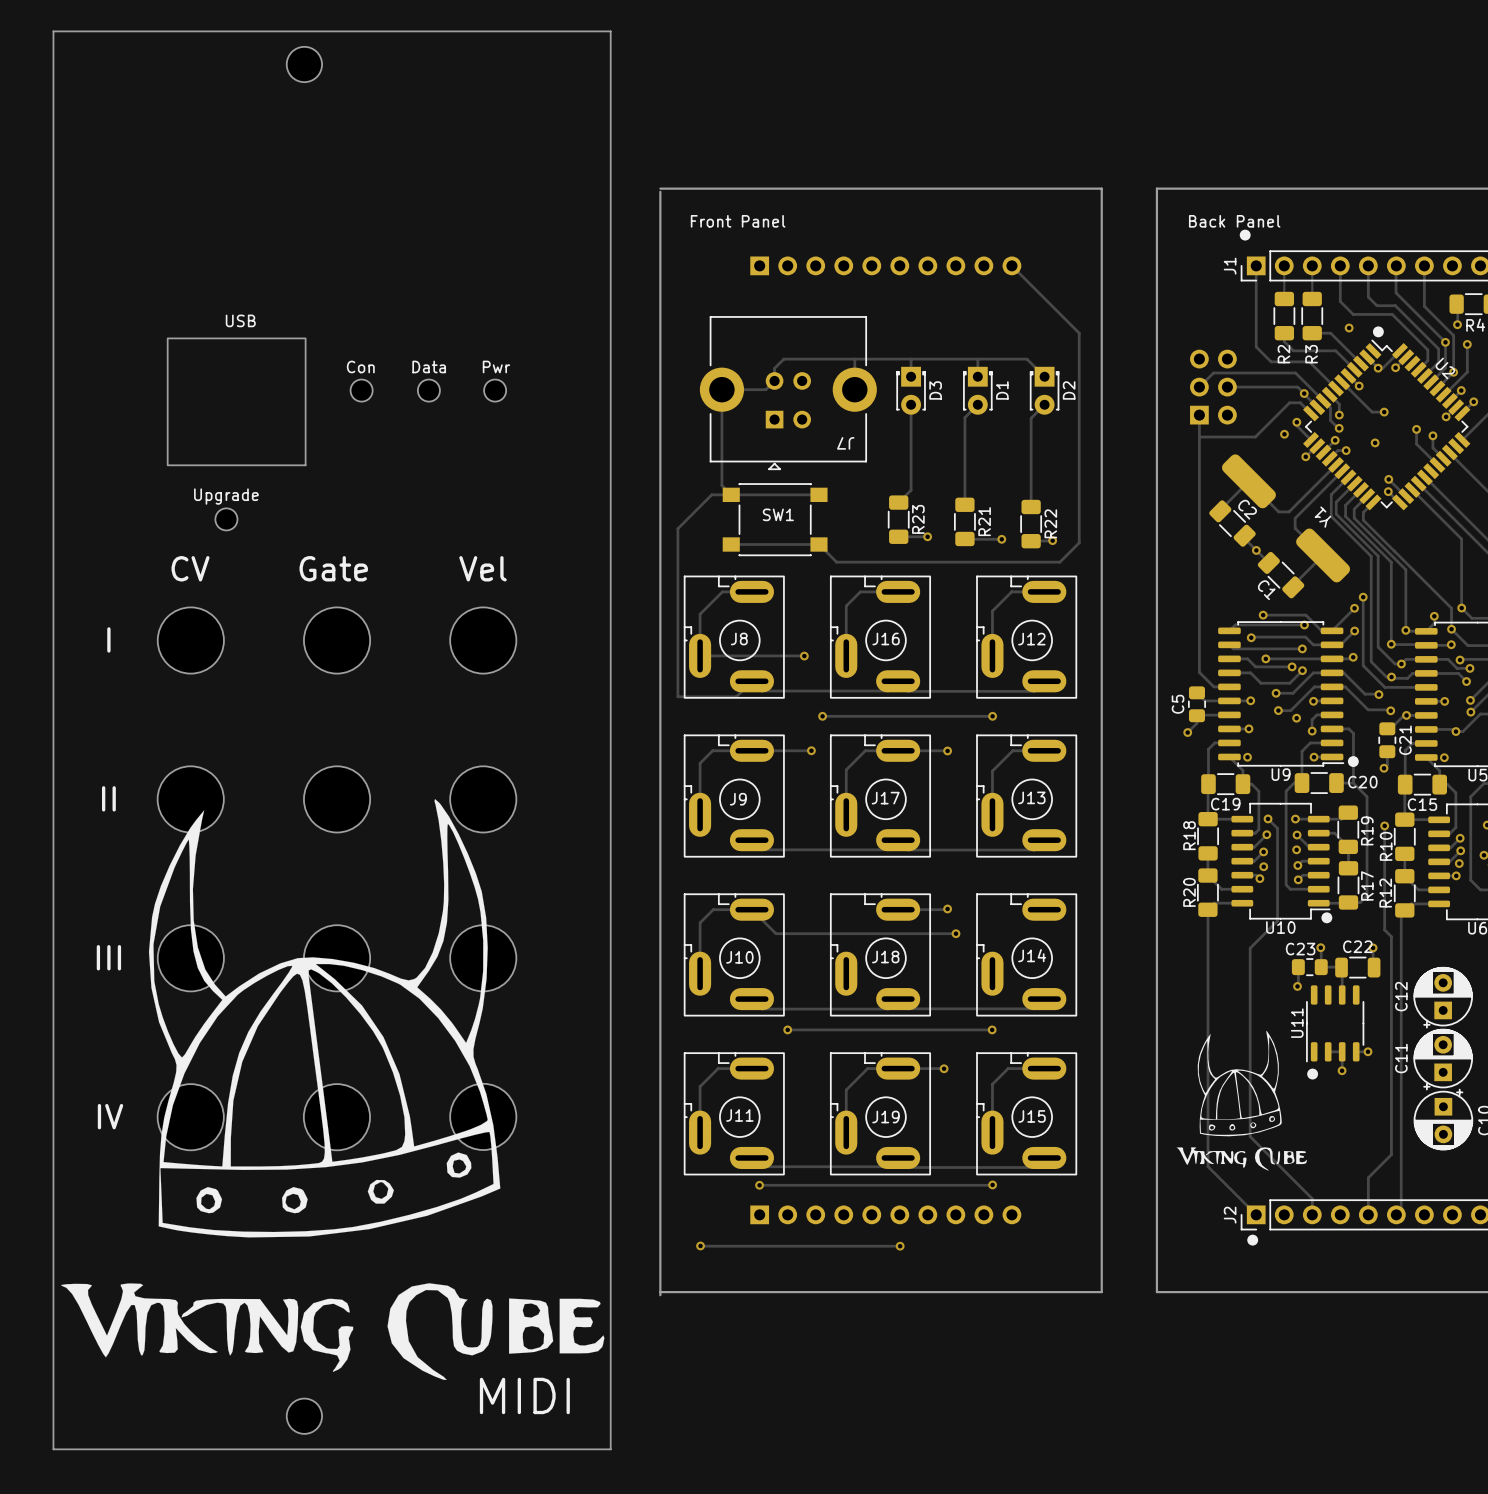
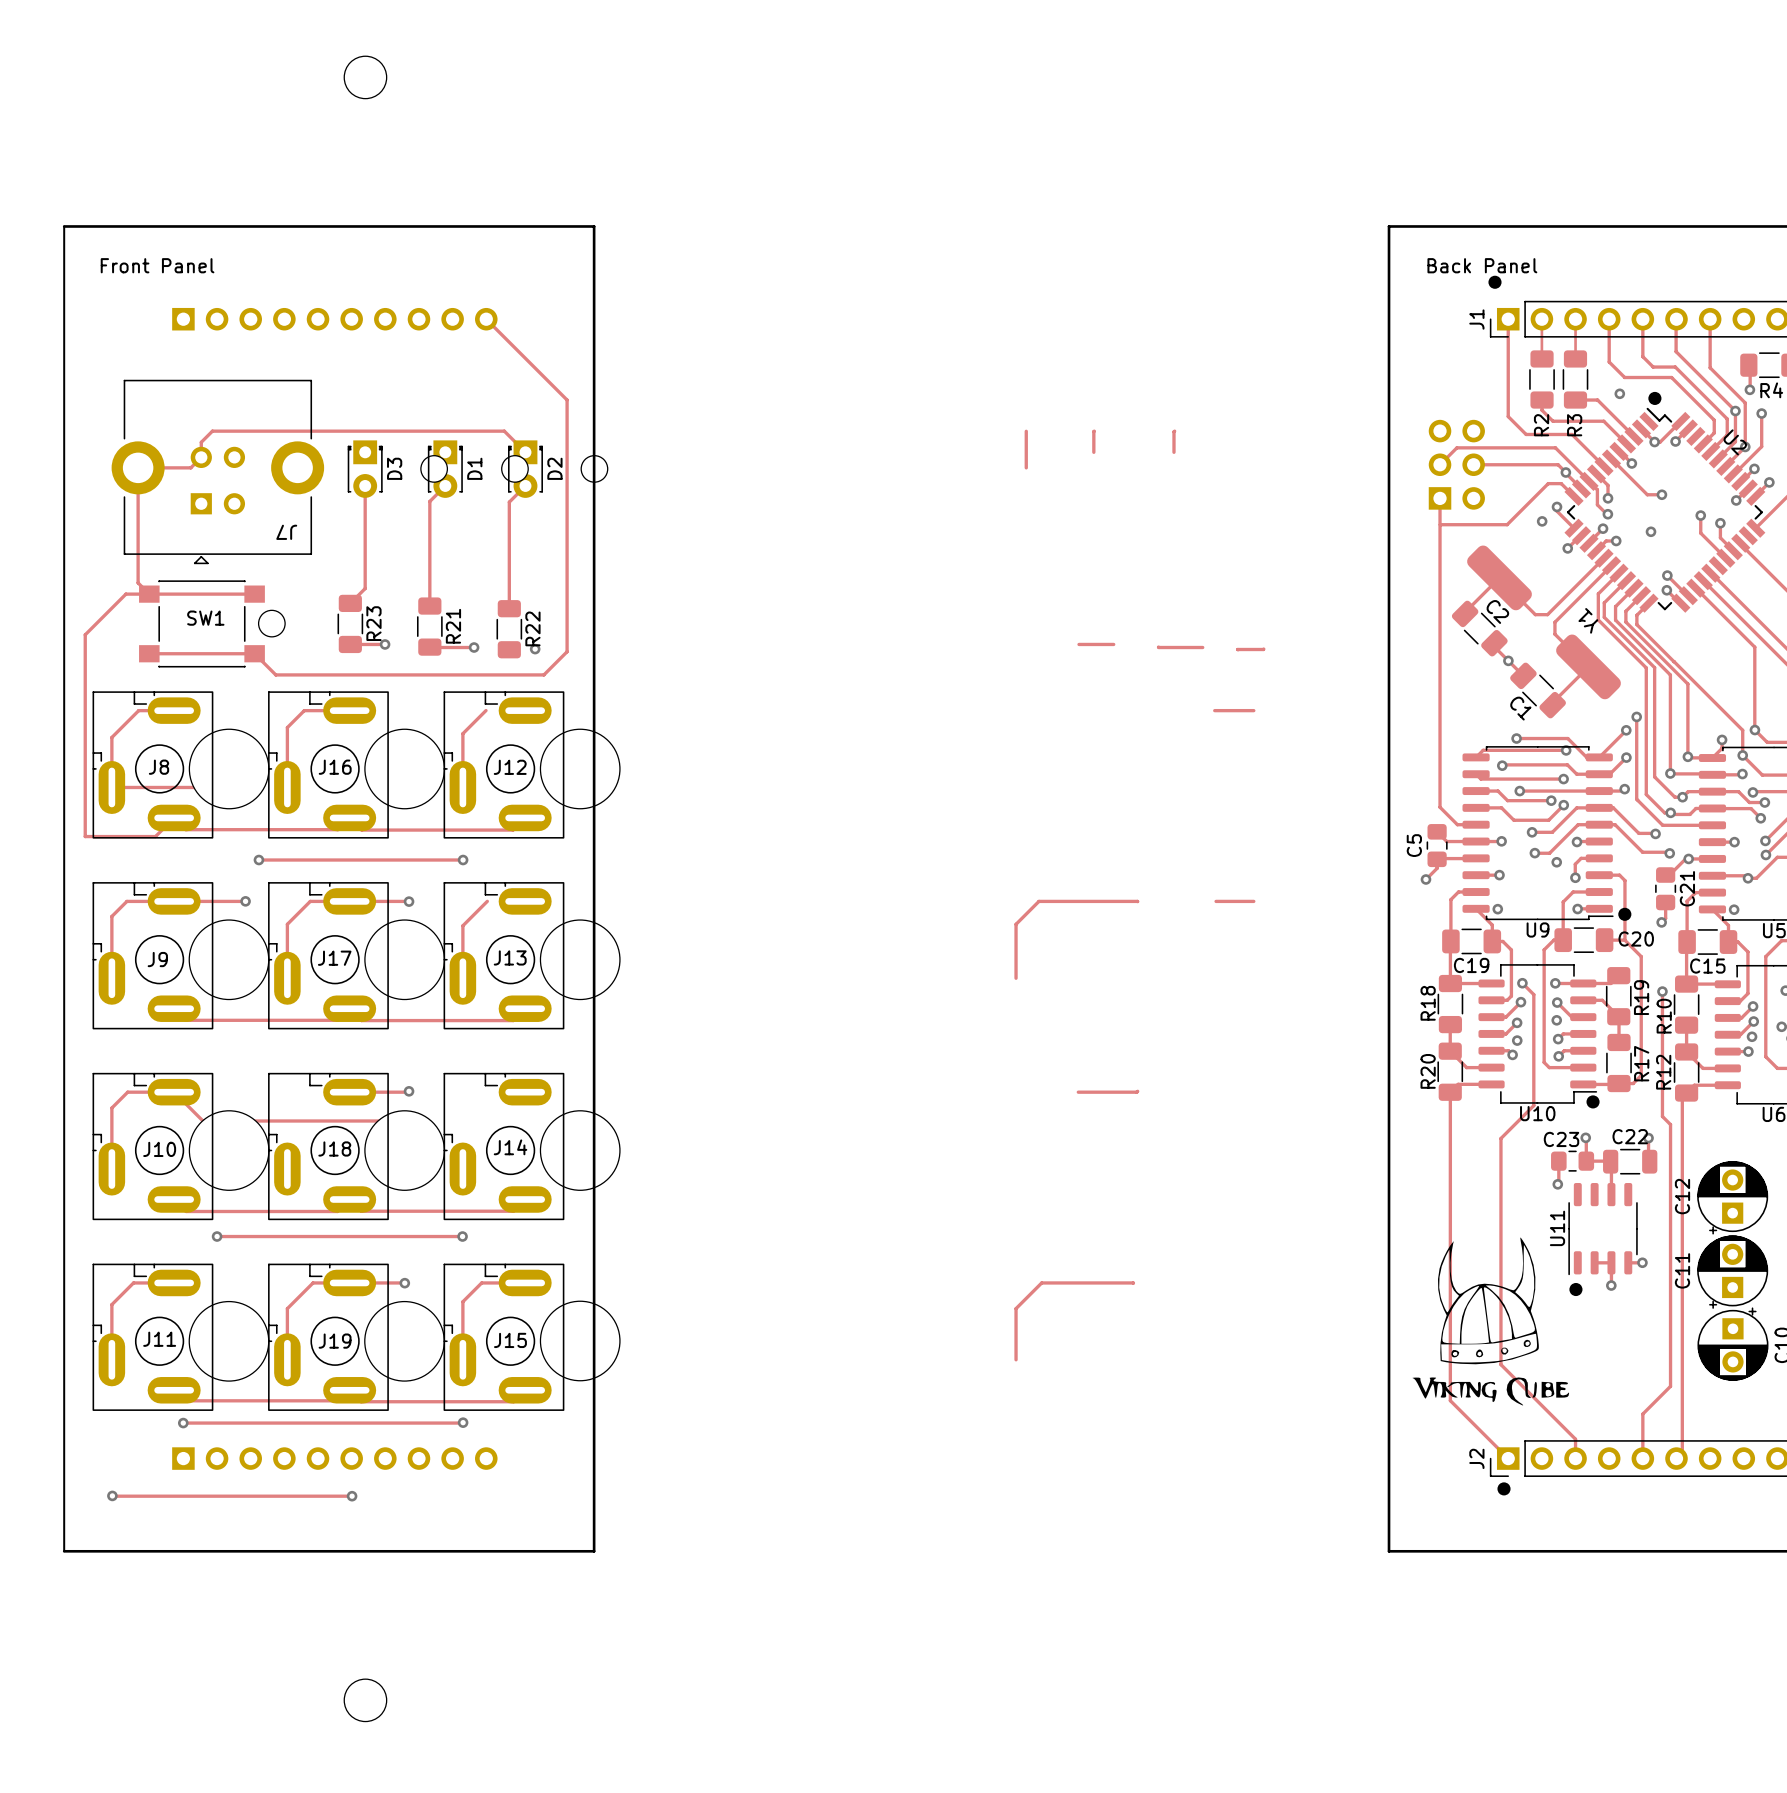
board edge: (53, 188) (53, 31) (610, 31) (610, 1449) (53, 1449) (53, 1292) -> (64, 226) (594, 226) (594, 1551) (64, 1551)
board edge: (660, 188) (1101, 188) (1101, 1292) (660, 1292) -> none
board edge: (660, 191) (660, 1295) -> none
text: none -> Front Panel (157, 265)
text: Front Panel (738, 221) -> none
part: none -> (334, 319)
track: none -> (486, 319) (567, 400) (567, 651) (543, 674) (275, 674) (254, 653) (149, 653)
part: (885, 265) -> none
track: (1011, 265) (1079, 333) (1079, 542) (1059, 562) (836, 562) (818, 544) (731, 544) -> none
text: USB (240, 320) -> none
drawing: [167, 337, 307, 466] -> none
text: Con (360, 366) -> none
text: Data (429, 366) -> none
text: Pwr (496, 366) -> none
track: none -> (525, 452) (504, 431) (212, 431) (201, 442) (201, 457) (190, 467) (138, 467) (138, 582) (149, 594)
track: (1044, 376) (1026, 359) (783, 359) (774, 368) (774, 380) (765, 389) (721, 389) (721, 485) (731, 494) -> none
D3 position: (911, 390) -> (365, 469)
D1 position: (977, 390) -> (445, 469)
D2 position: (1044, 390) -> (525, 469)
J7 position: (788, 393) -> (217, 471)
track: none -> (365, 485) (365, 588) (350, 603)
track: none -> (445, 485) (429, 501) (429, 606)
track: none -> (525, 485) (509, 502) (509, 608)
track: (911, 404) (911, 490) (898, 502) -> none
track: (977, 404) (964, 417) (964, 504) -> none
track: (1044, 404) (1031, 418) (1031, 506) -> none
track: none -> (254, 594) (125, 594) (85, 634) (85, 836) (155, 836) (174, 817) (185, 829) (337, 829) (349, 817) (361, 830) (513, 830) (525, 817)
track: (818, 494) (711, 494) (677, 528) (677, 696) (736, 696) (751, 681) (761, 691) (888, 691) (898, 681) (908, 691) (1034, 691) (1044, 681) -> none
text: Upgrade (226, 496) -> none
SW1 position: (775, 519) -> (201, 623)
R23 position: (898, 519) -> (350, 623)
R21 position: (964, 521) -> (429, 626)
R22 position: (1031, 524) -> (509, 629)
track: none -> (350, 644) (385, 644)
via: none -> (385, 644)
via: (927, 536) -> none
track: none -> (429, 647) (474, 647)
via: none -> (474, 647)
via: (1001, 539) -> none
via: none -> (535, 649)
via: (1052, 540) -> none
text: CV (190, 568) -> none
text: Gate (333, 568) -> none
text: Vel (483, 568) -> none
track: none -> (174, 710) (138, 710) (111, 737) (111, 787) (237, 787)
track: none -> (349, 710) (304, 710) (287, 727) (287, 787)
track: none -> (486, 710) (462, 733) (462, 787)
track: (751, 591) (722, 591) (700, 614) (700, 655) (804, 656) -> none
track: (898, 591) (860, 591) (846, 605) (846, 655) -> none
track: (1011, 591) (992, 611) (992, 655) -> none
J8 position: (734, 637) -> (152, 764)
J16 position: (880, 637) -> (328, 764)
J12 position: (1026, 637) -> (503, 764)
text: I (108, 639) -> none
via: (804, 656) -> none
track: none -> (258, 860) (463, 860)
via: none -> (258, 860)
via: none -> (463, 860)
track: (822, 716) (992, 716) -> none
via: (822, 716) -> none
via: (992, 716) -> none
track: none -> (245, 901) (126, 901) (111, 916) (111, 978)
via: none -> (245, 901)
track: none -> (409, 901) (310, 901) (287, 924) (287, 978)
via: none -> (409, 901)
track: none -> (487, 901) (462, 925) (462, 978)
track: (811, 750) (712, 750) (700, 763) (700, 814) -> none
via: (811, 750) -> none
via: (947, 750) -> none
track: (1012, 750) (992, 771) (992, 814) -> none
J9 position: (734, 796) -> (152, 955)
J17 position: (880, 796) -> (328, 955)
J13 position: (1026, 796) -> (503, 955)
text: II (108, 798) -> none
drawing: [60, 799, 605, 1380] -> none
track: none -> (174, 1008) (185, 1020) (338, 1020) (349, 1008) (361, 1020) (513, 1020) (525, 1008)
track: (751, 840) (761, 849) (888, 849) (898, 840) (908, 850) (1034, 850) (1044, 840) -> none
track: none -> (409, 1091) (349, 1092)
via: none -> (409, 1091)
via: (947, 908) -> none
track: none -> (419, 1121) (202, 1121) (174, 1092) (127, 1092) (111, 1108) (111, 1169)
track: (955, 933) (775, 933) (751, 909) (713, 909) (700, 922) (700, 973) -> none
via: (955, 933) -> none
J10 position: (734, 954) -> (152, 1146)
J18 position: (880, 954) -> (328, 1146)
J14 position: (1026, 954) -> (503, 1146)
text: III (108, 957) -> none
track: none -> (174, 1199) (186, 1211) (337, 1211) (349, 1199) (361, 1211) (513, 1211) (525, 1199)
track: (751, 999) (761, 1009) (888, 1009) (898, 999) (907, 1008) (1034, 1008) (1044, 999) -> none
track: none -> (217, 1236) (462, 1236)
via: none -> (217, 1236)
via: none -> (462, 1236)
track: (787, 1029) (992, 1029) -> none
via: (787, 1029) -> none
via: (992, 1029) -> none
track: none -> (174, 1282) (133, 1282) (111, 1304) (111, 1359)
track: none -> (404, 1283) (313, 1282) (287, 1308) (287, 1359)
via: none -> (404, 1283)
track: none -> (525, 1282) (481, 1282) (462, 1301) (462, 1359)
track: (751, 1068) (718, 1068) (700, 1086) (700, 1132) -> none
via: (944, 1068) -> none
track: (1044, 1068) (1008, 1068) (992, 1084) (992, 1132) -> none
J11 position: (734, 1113) -> (152, 1337)
J19 position: (880, 1113) -> (328, 1337)
J15 position: (1026, 1113) -> (503, 1337)
text: IV (110, 1116) -> none
track: none -> (174, 1390) (184, 1400) (339, 1400) (349, 1390) (361, 1401) (513, 1401) (525, 1390)
track: (751, 1157) (760, 1166) (889, 1166) (898, 1157) (907, 1167) (1034, 1167) (1044, 1157) -> none
track: none -> (463, 1422) (183, 1423)
via: none -> (463, 1422)
track: (992, 1184) (759, 1185) -> none
via: (992, 1184) -> none
via: none -> (183, 1423)
via: (759, 1185) -> none
part: none -> (334, 1458)
part: (885, 1214) -> none
track: none -> (112, 1495) (352, 1496)
via: none -> (112, 1495)
track: (700, 1245) (900, 1246) -> none
via: (700, 1245) -> none
via: none -> (352, 1496)
via: (900, 1246) -> none
text: MIDI (524, 1395) -> none

